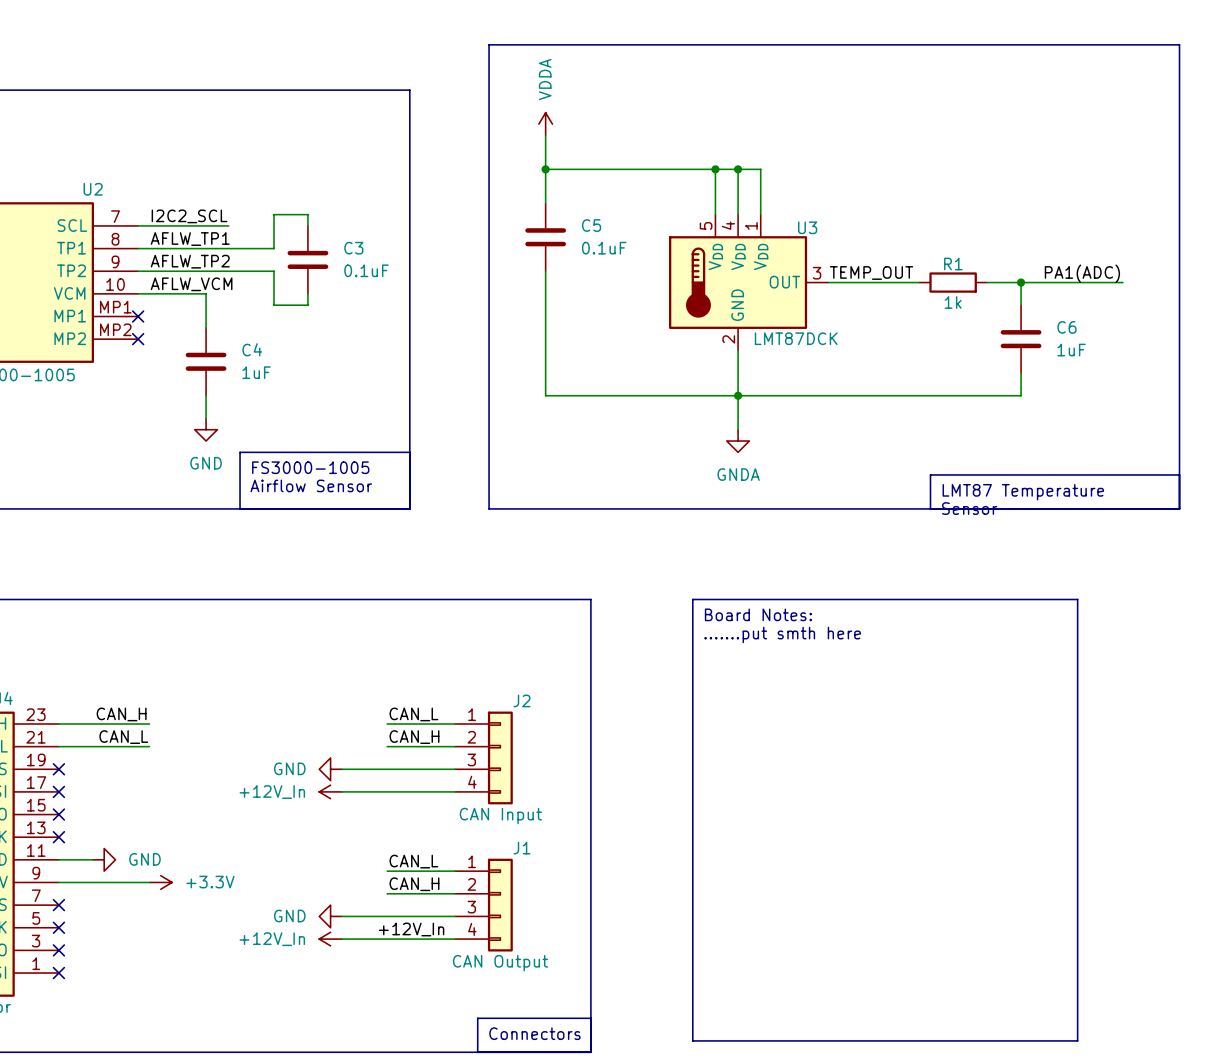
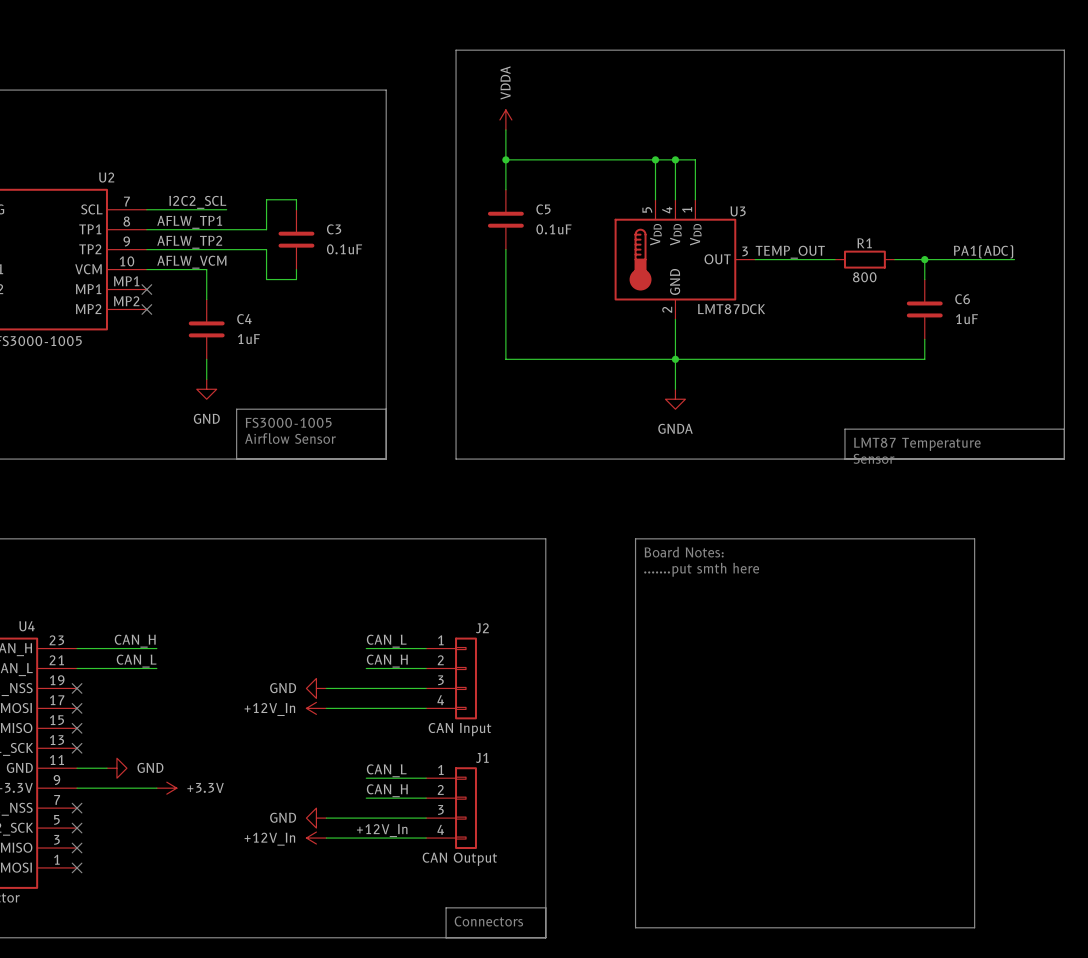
R1 value: 1k (953, 302) -> 800 (864, 277)

